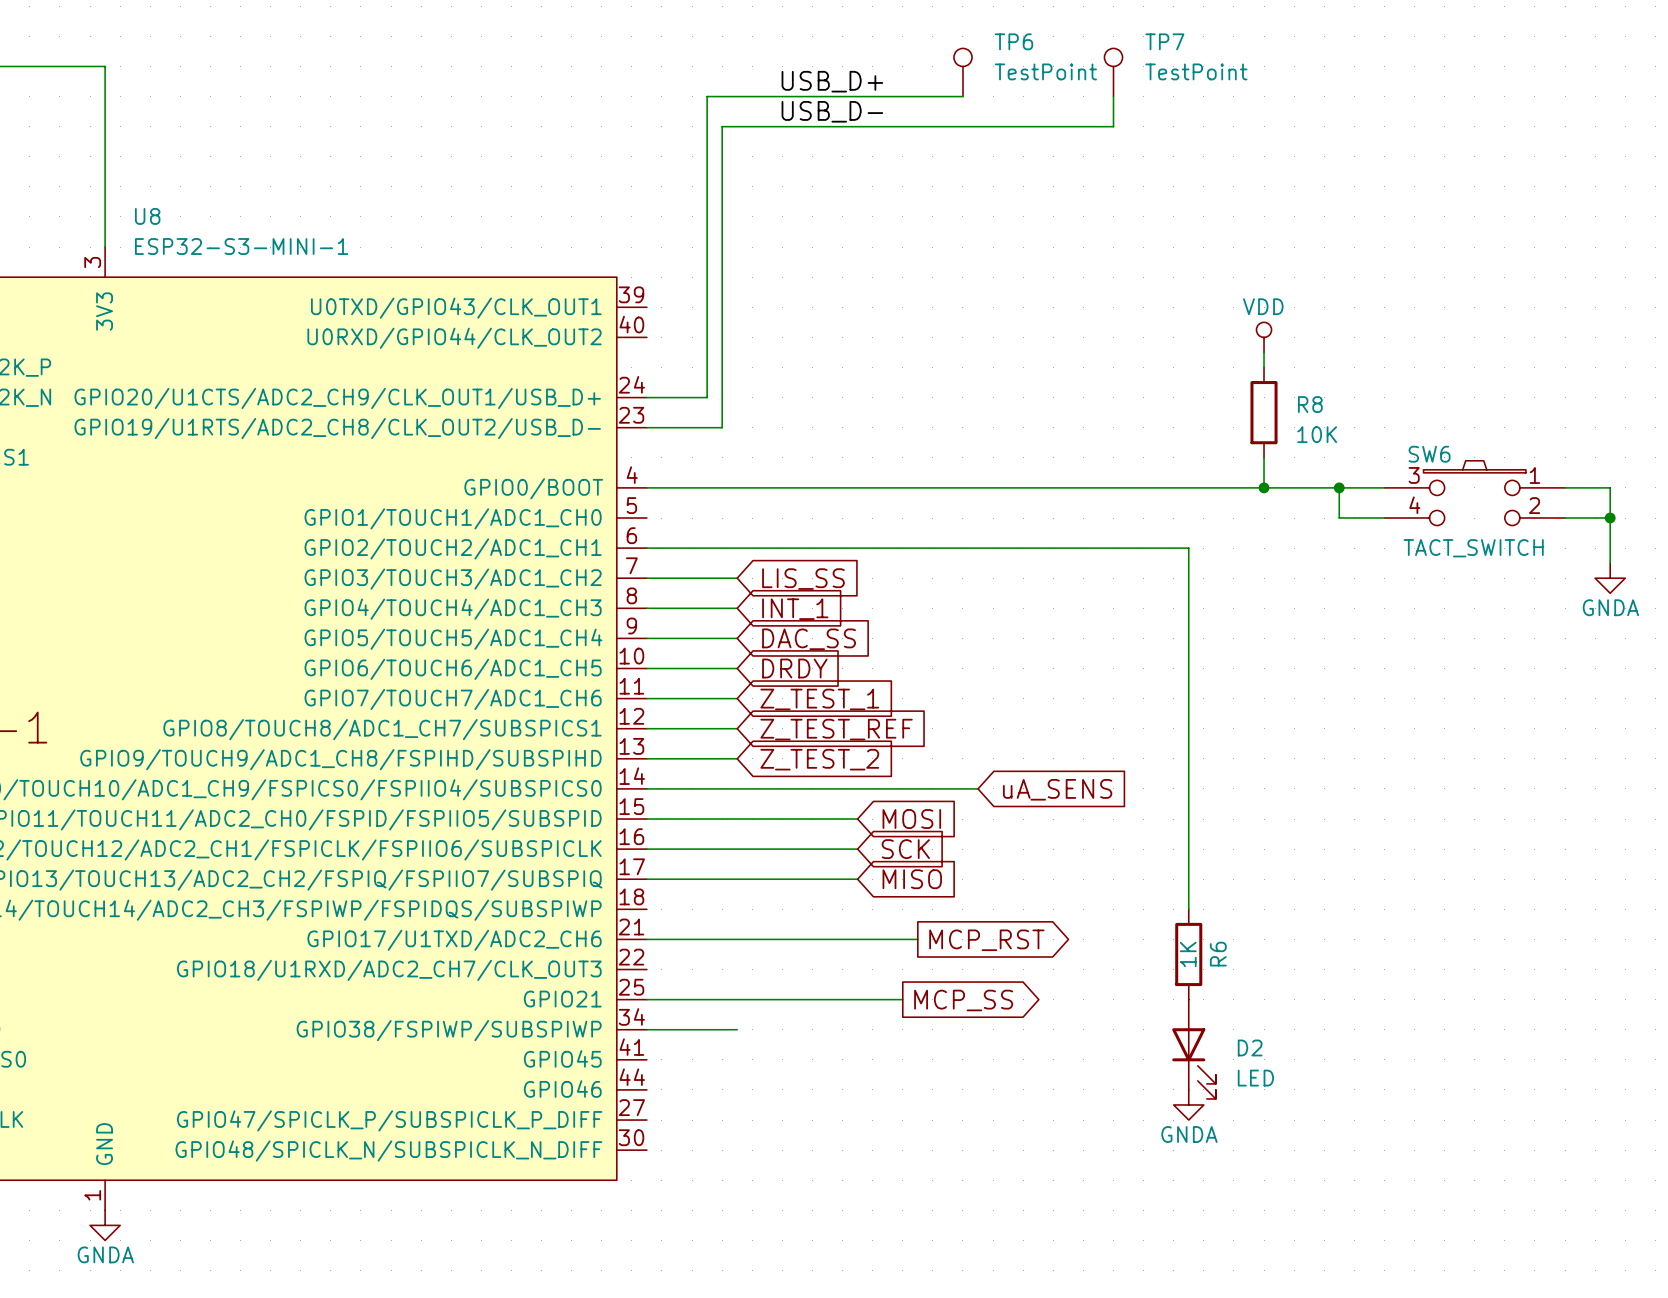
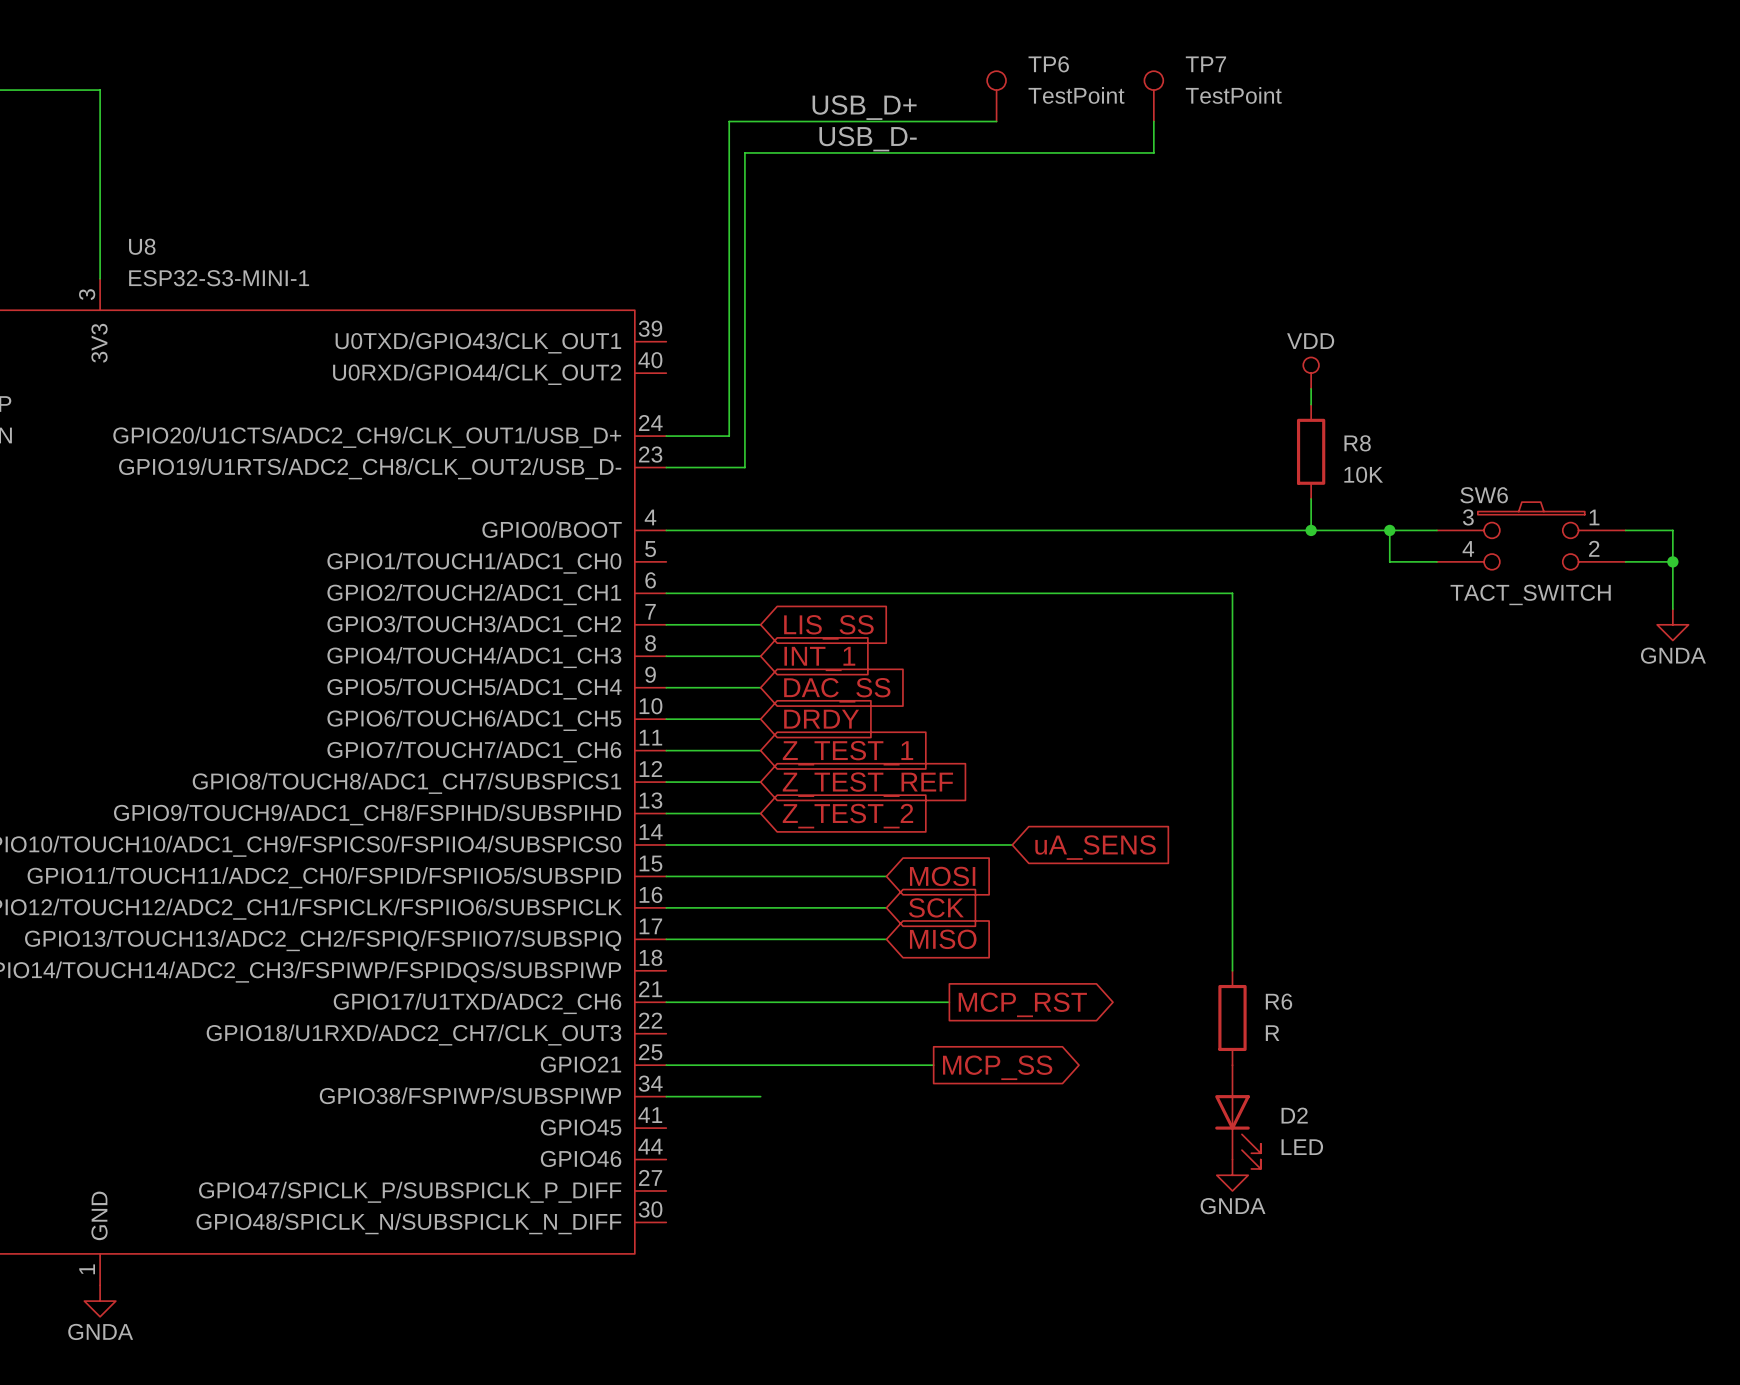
R6 value: 1K (1188, 954) -> R (1272, 1033)
R6 name rotation: 0° (1218, 954) -> 90° clockwise (1278, 1001)

